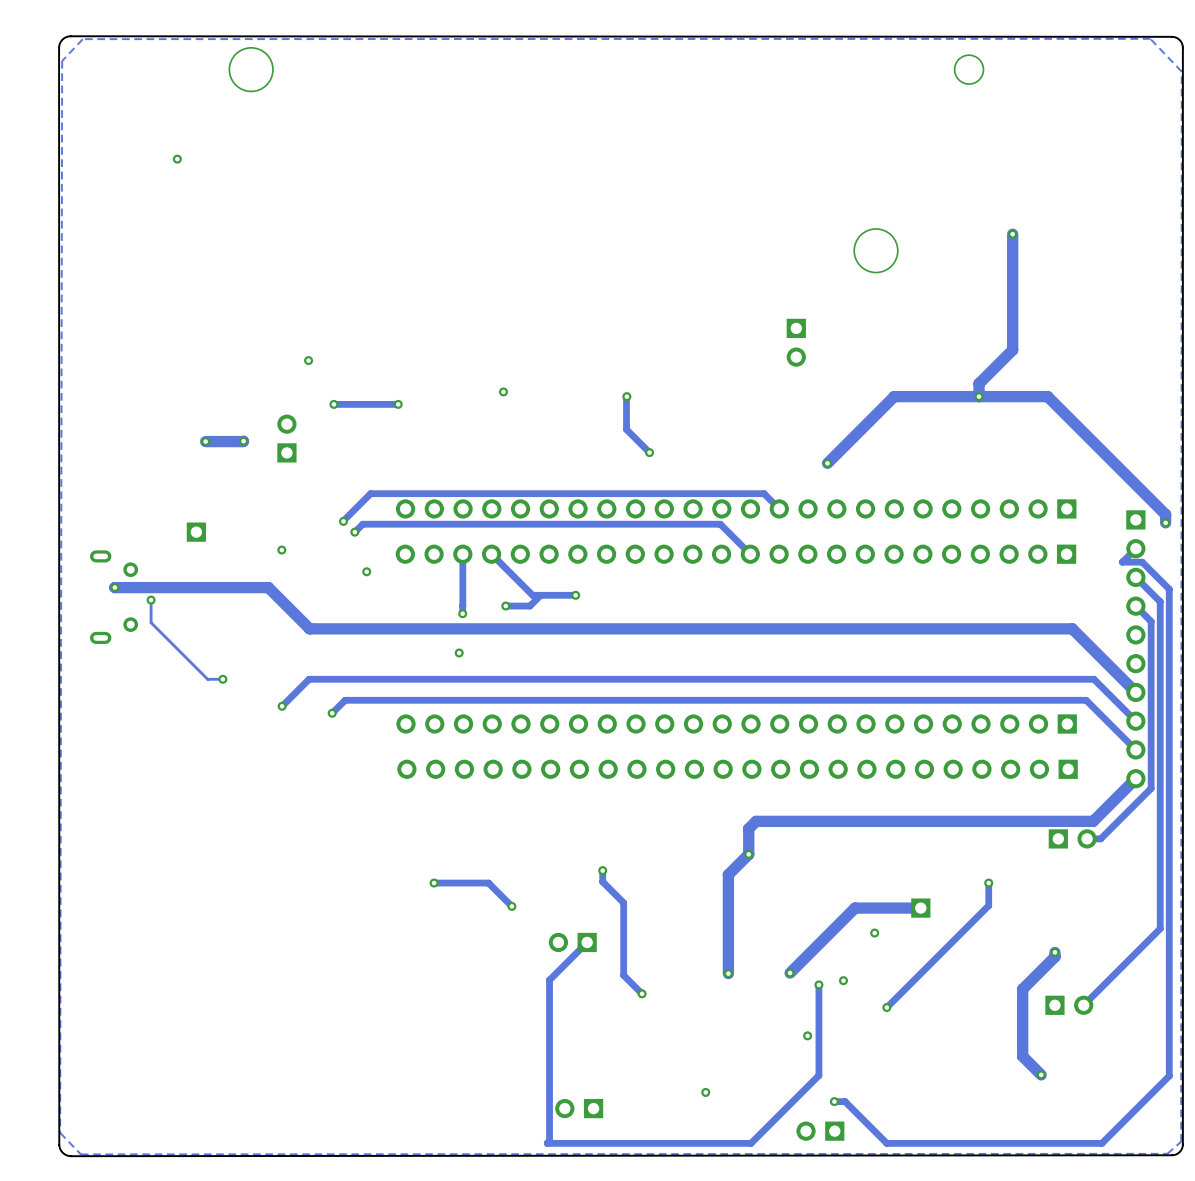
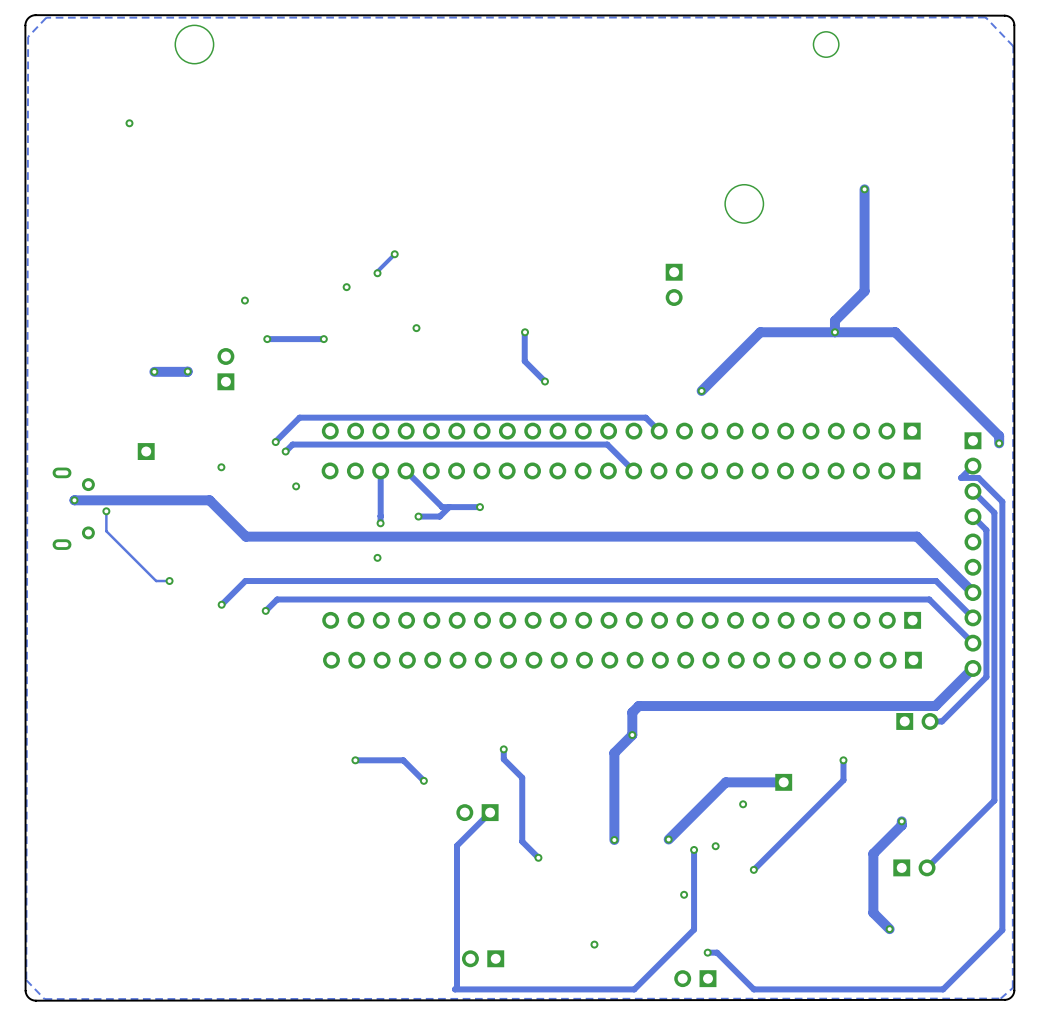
track: none -> (394, 254) (377, 273)
via: none -> (394, 254)
via: none -> (377, 273)
via: none -> (346, 287)

